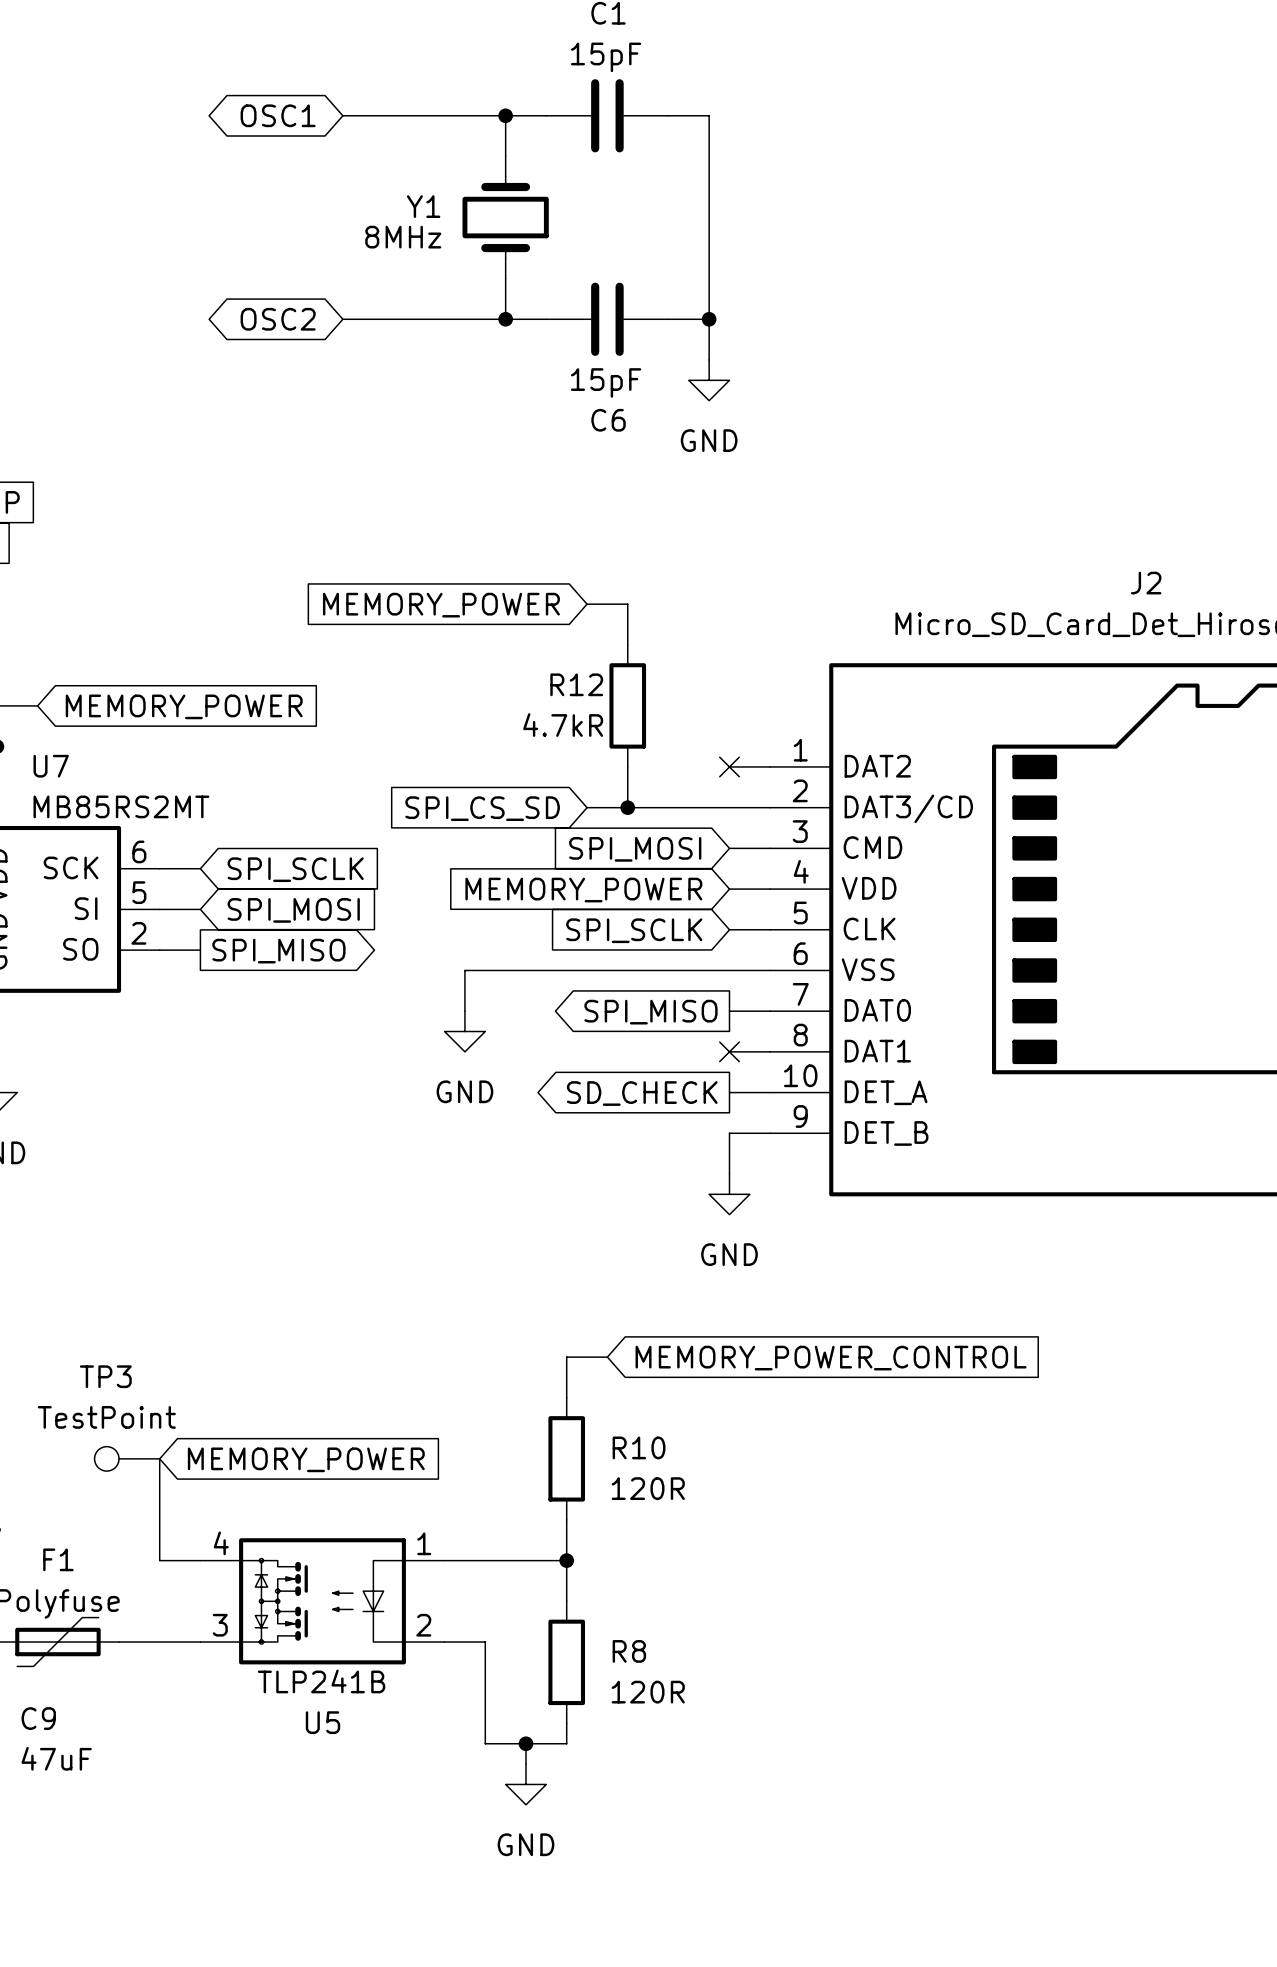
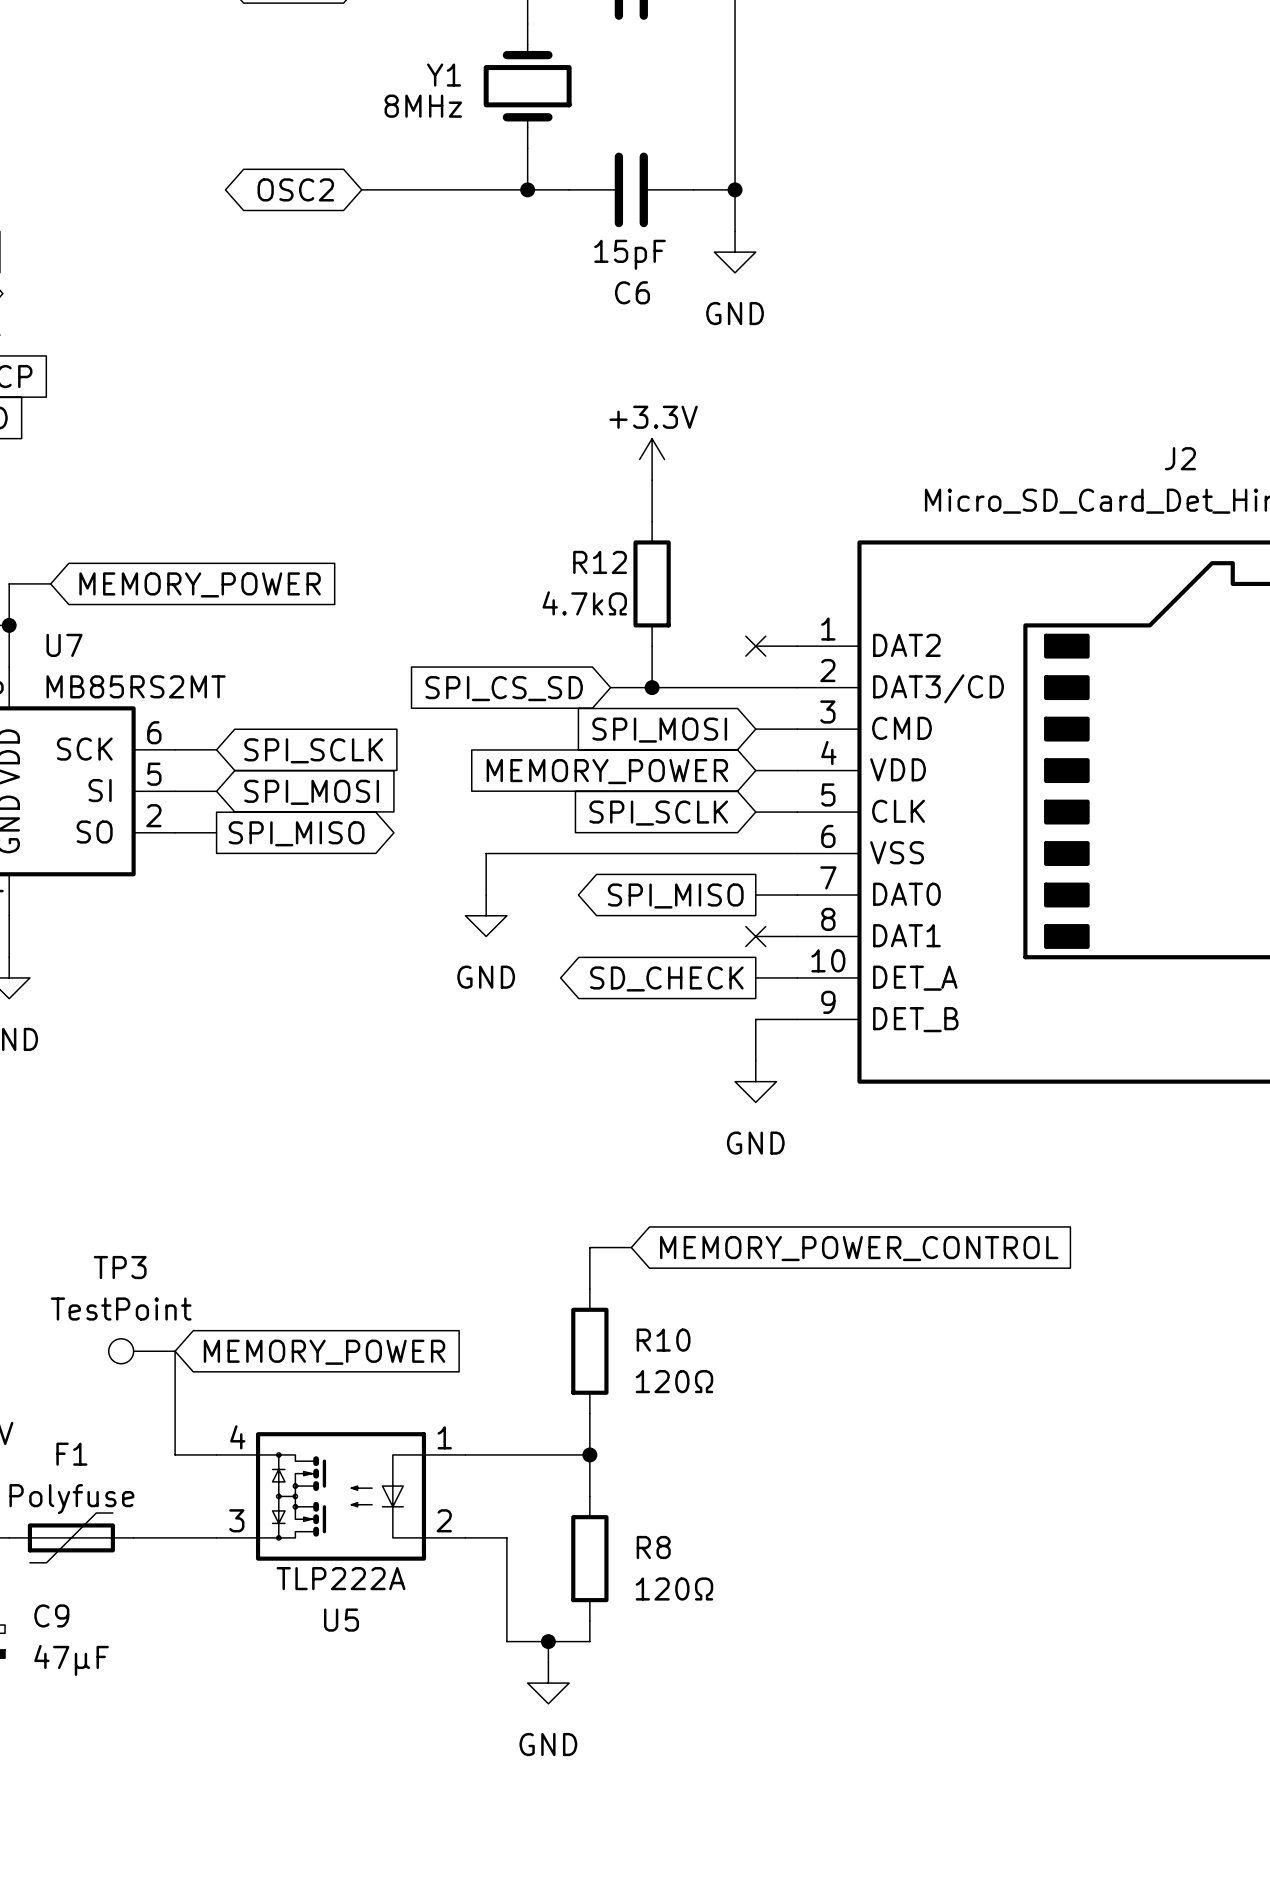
power symbol: none -> +3.3V (652, 459)
wire: (587, 604) (627, 604) -> none
global label: MEMORY_POWER (441, 605) -> none
R12 value: 4.7kR (563, 725) -> 4.7kΩ (584, 603)
R10 value: 120R (648, 1488) -> 120Ω (674, 1381)
U5 value: TLP241B (321, 1681) -> TLP222A (341, 1578)
R8 value: 120R (648, 1692) -> 120Ω (674, 1588)
C9 value: 47uF (56, 1758) -> 47μF (71, 1660)

